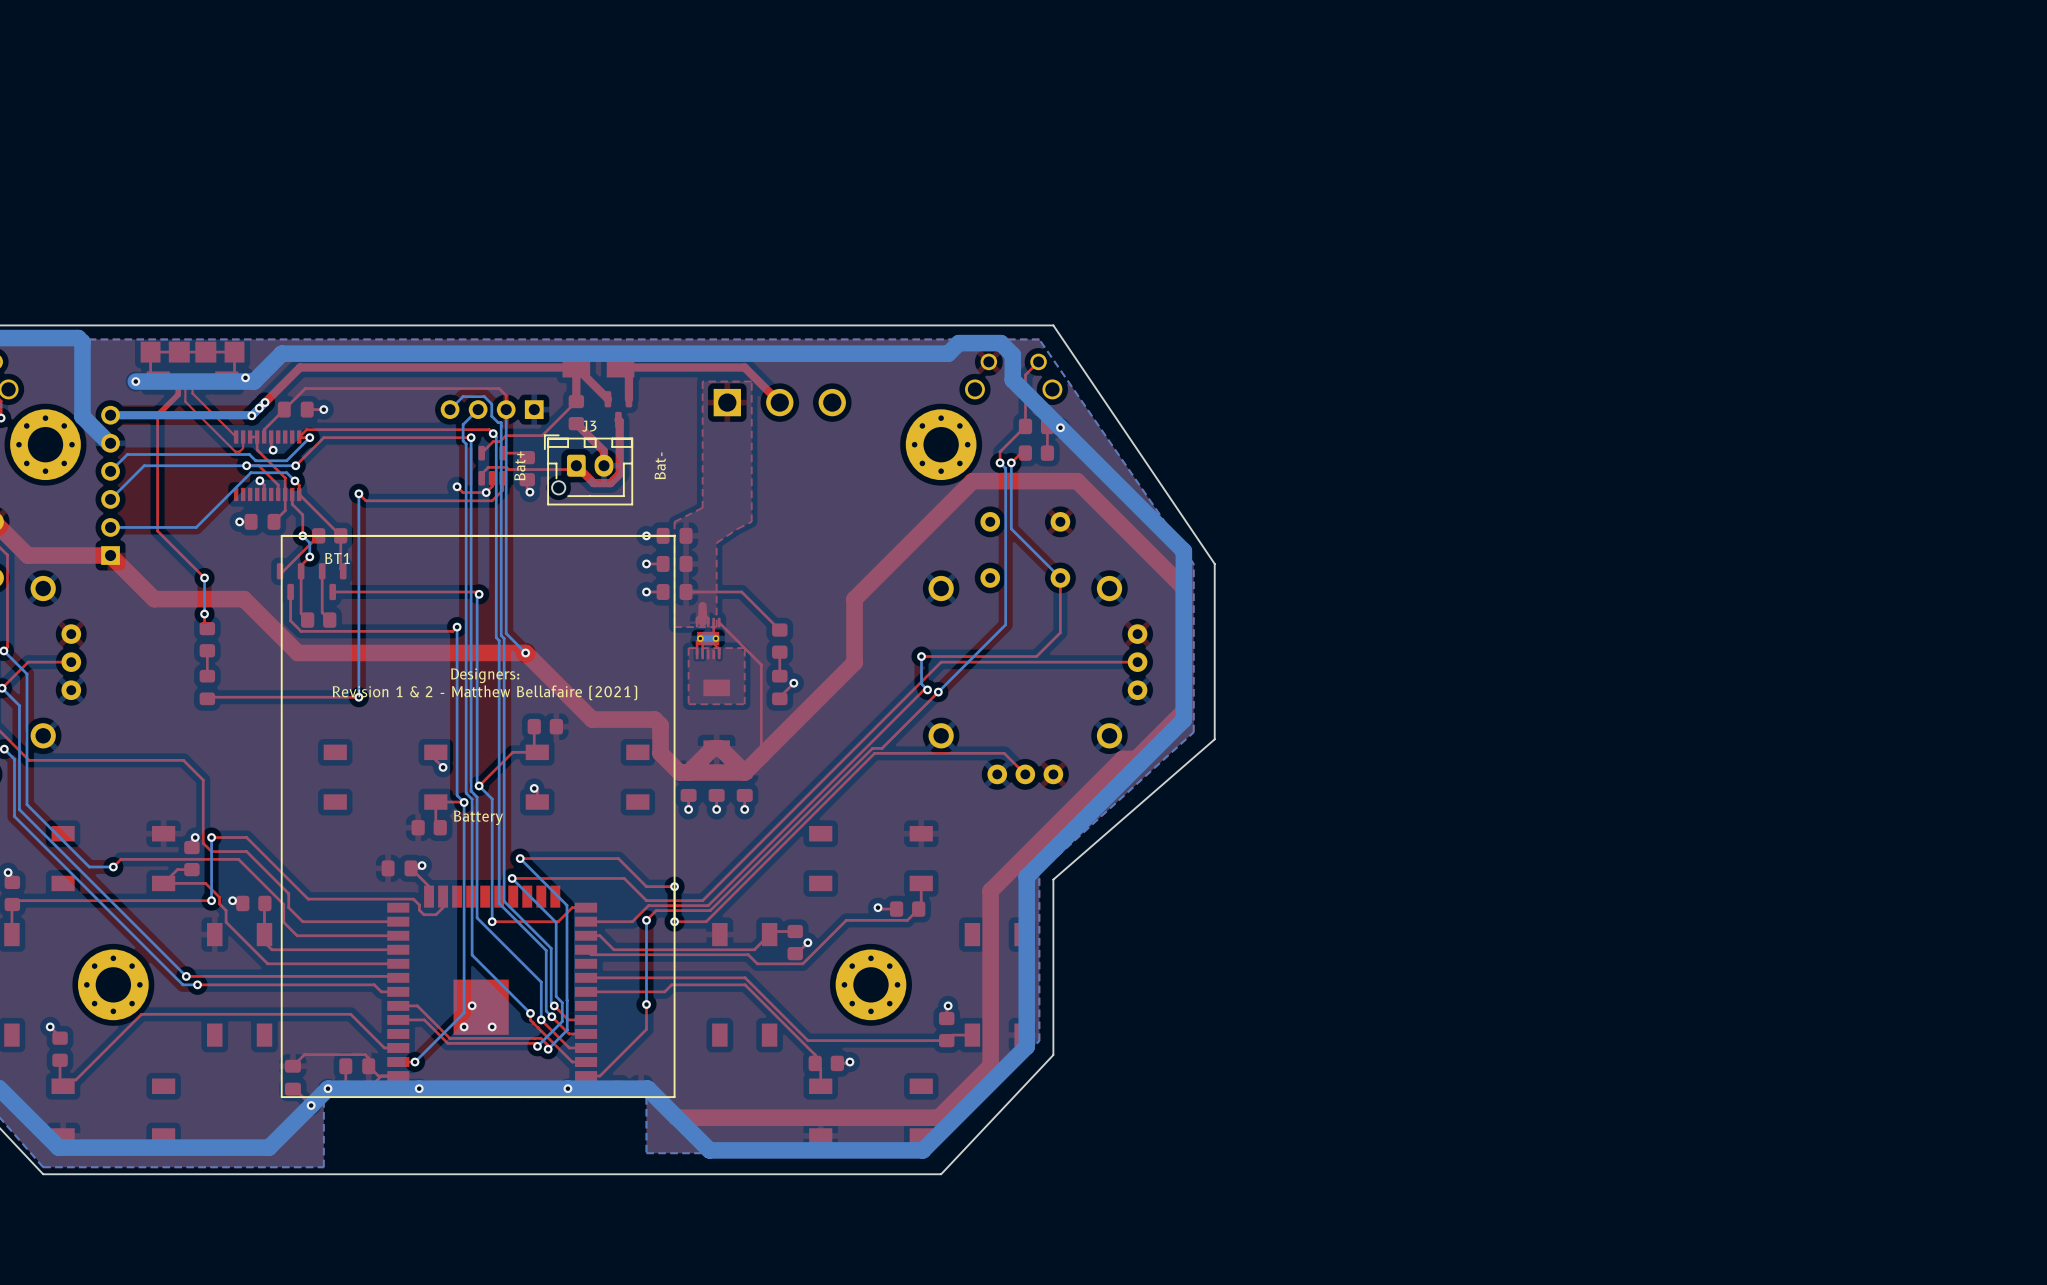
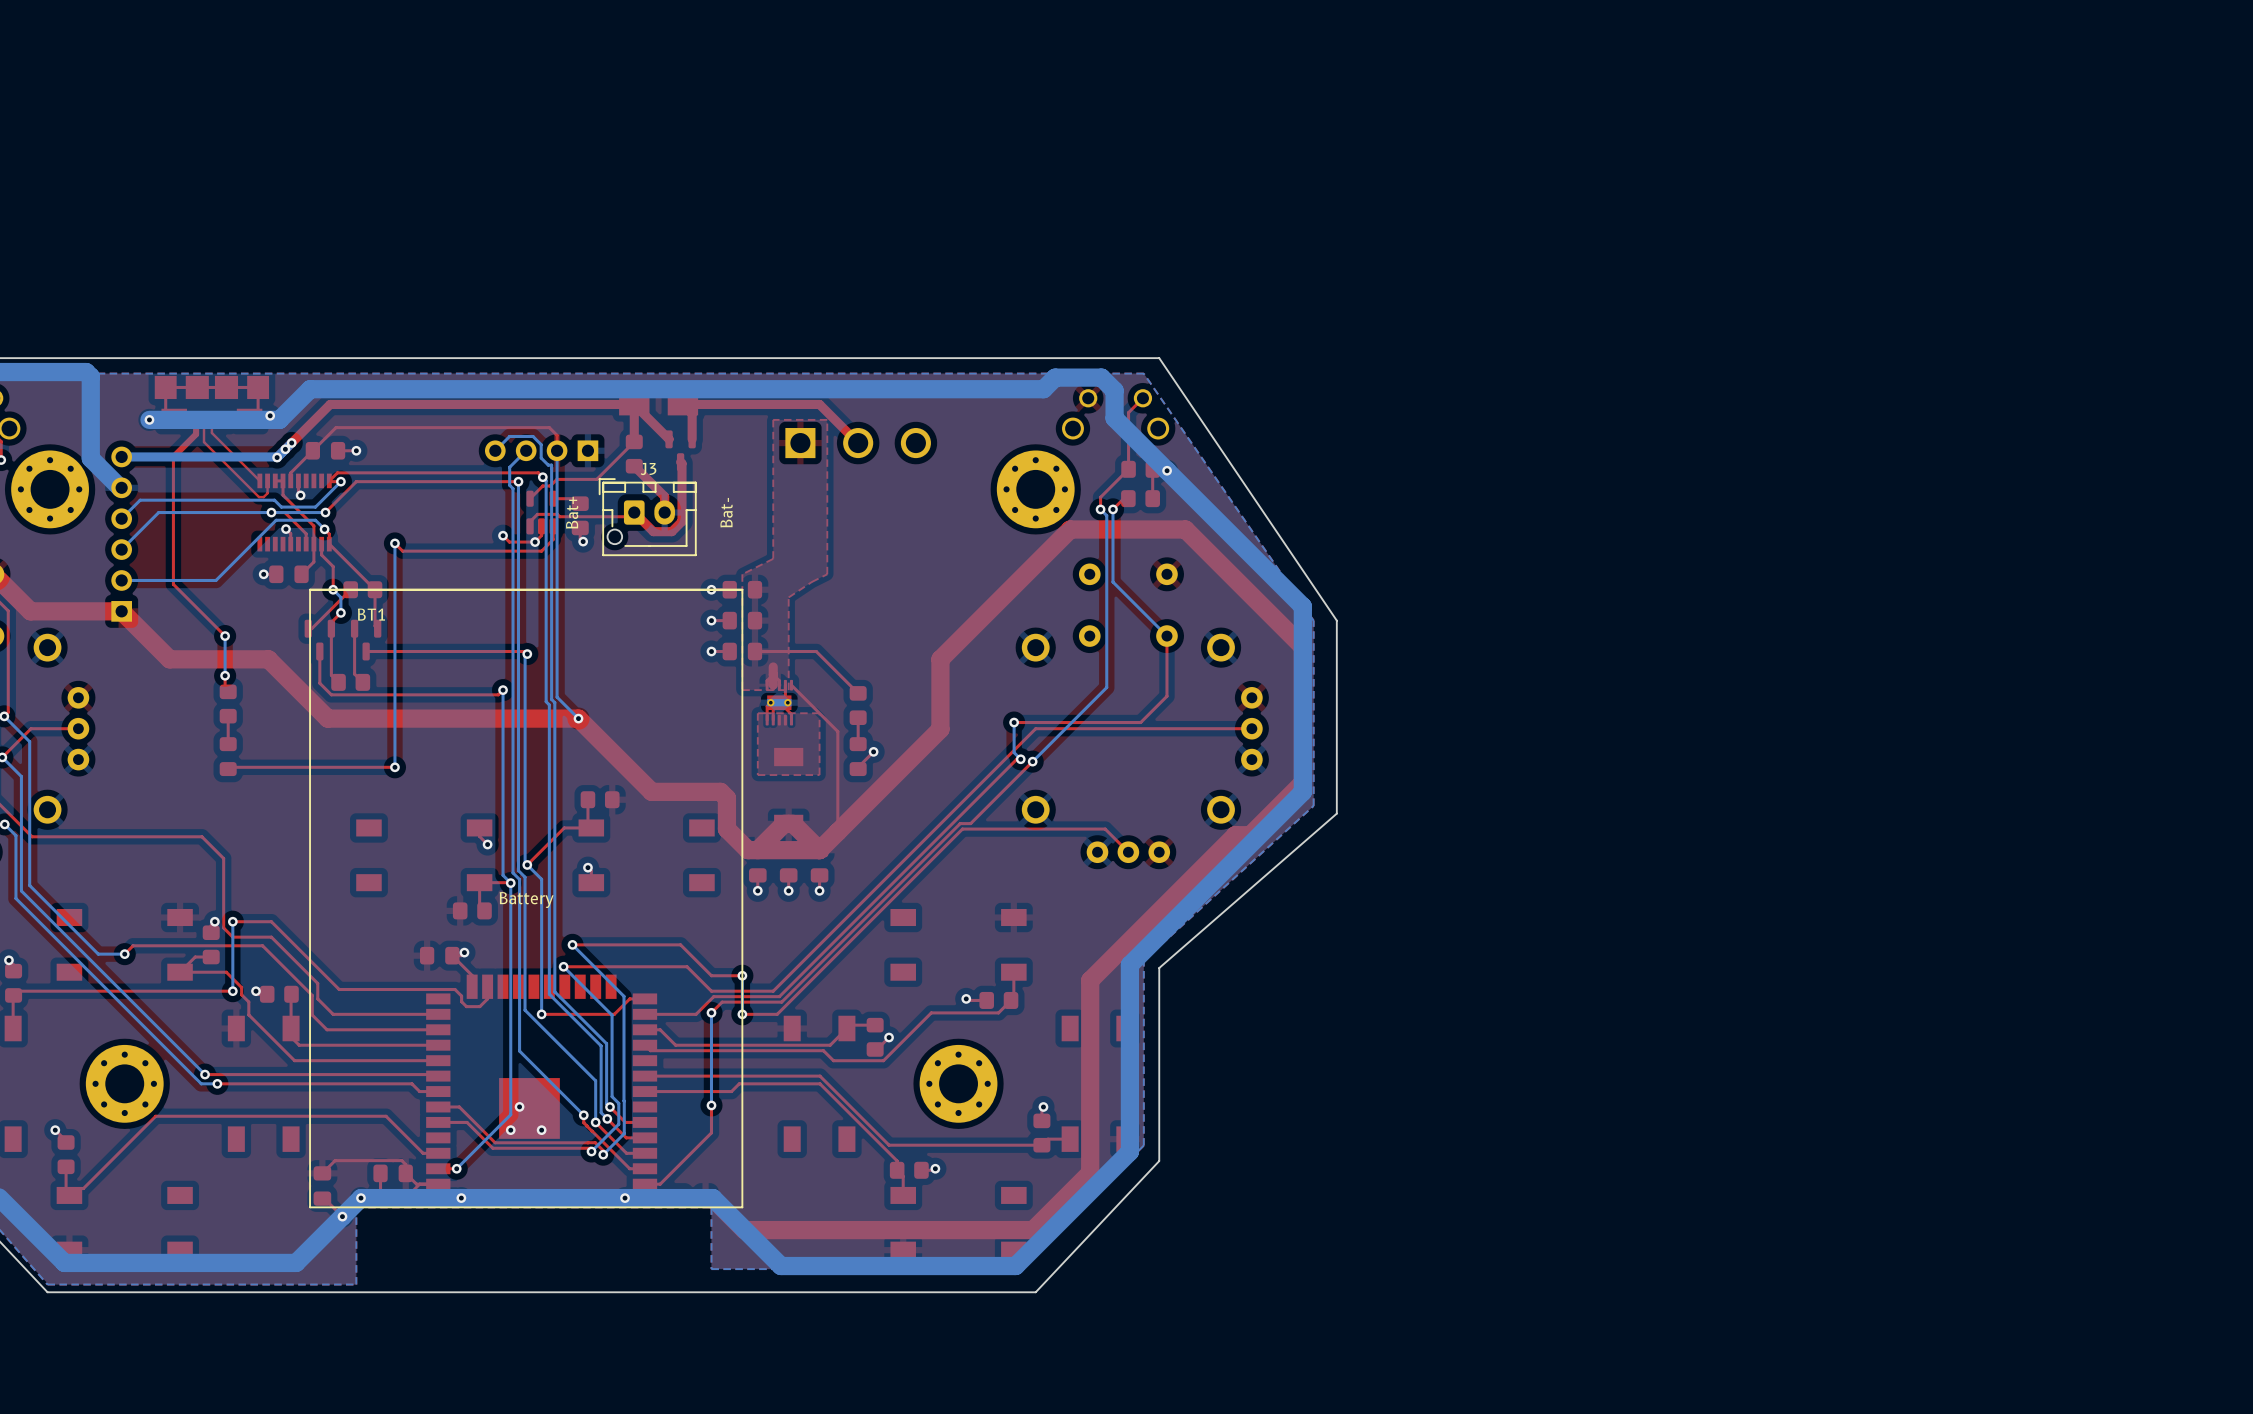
text: Designers: (485, 675) -> none
text: Revision 1 & 2 - Matthew Bellafaire (2021) (484, 692) -> none

